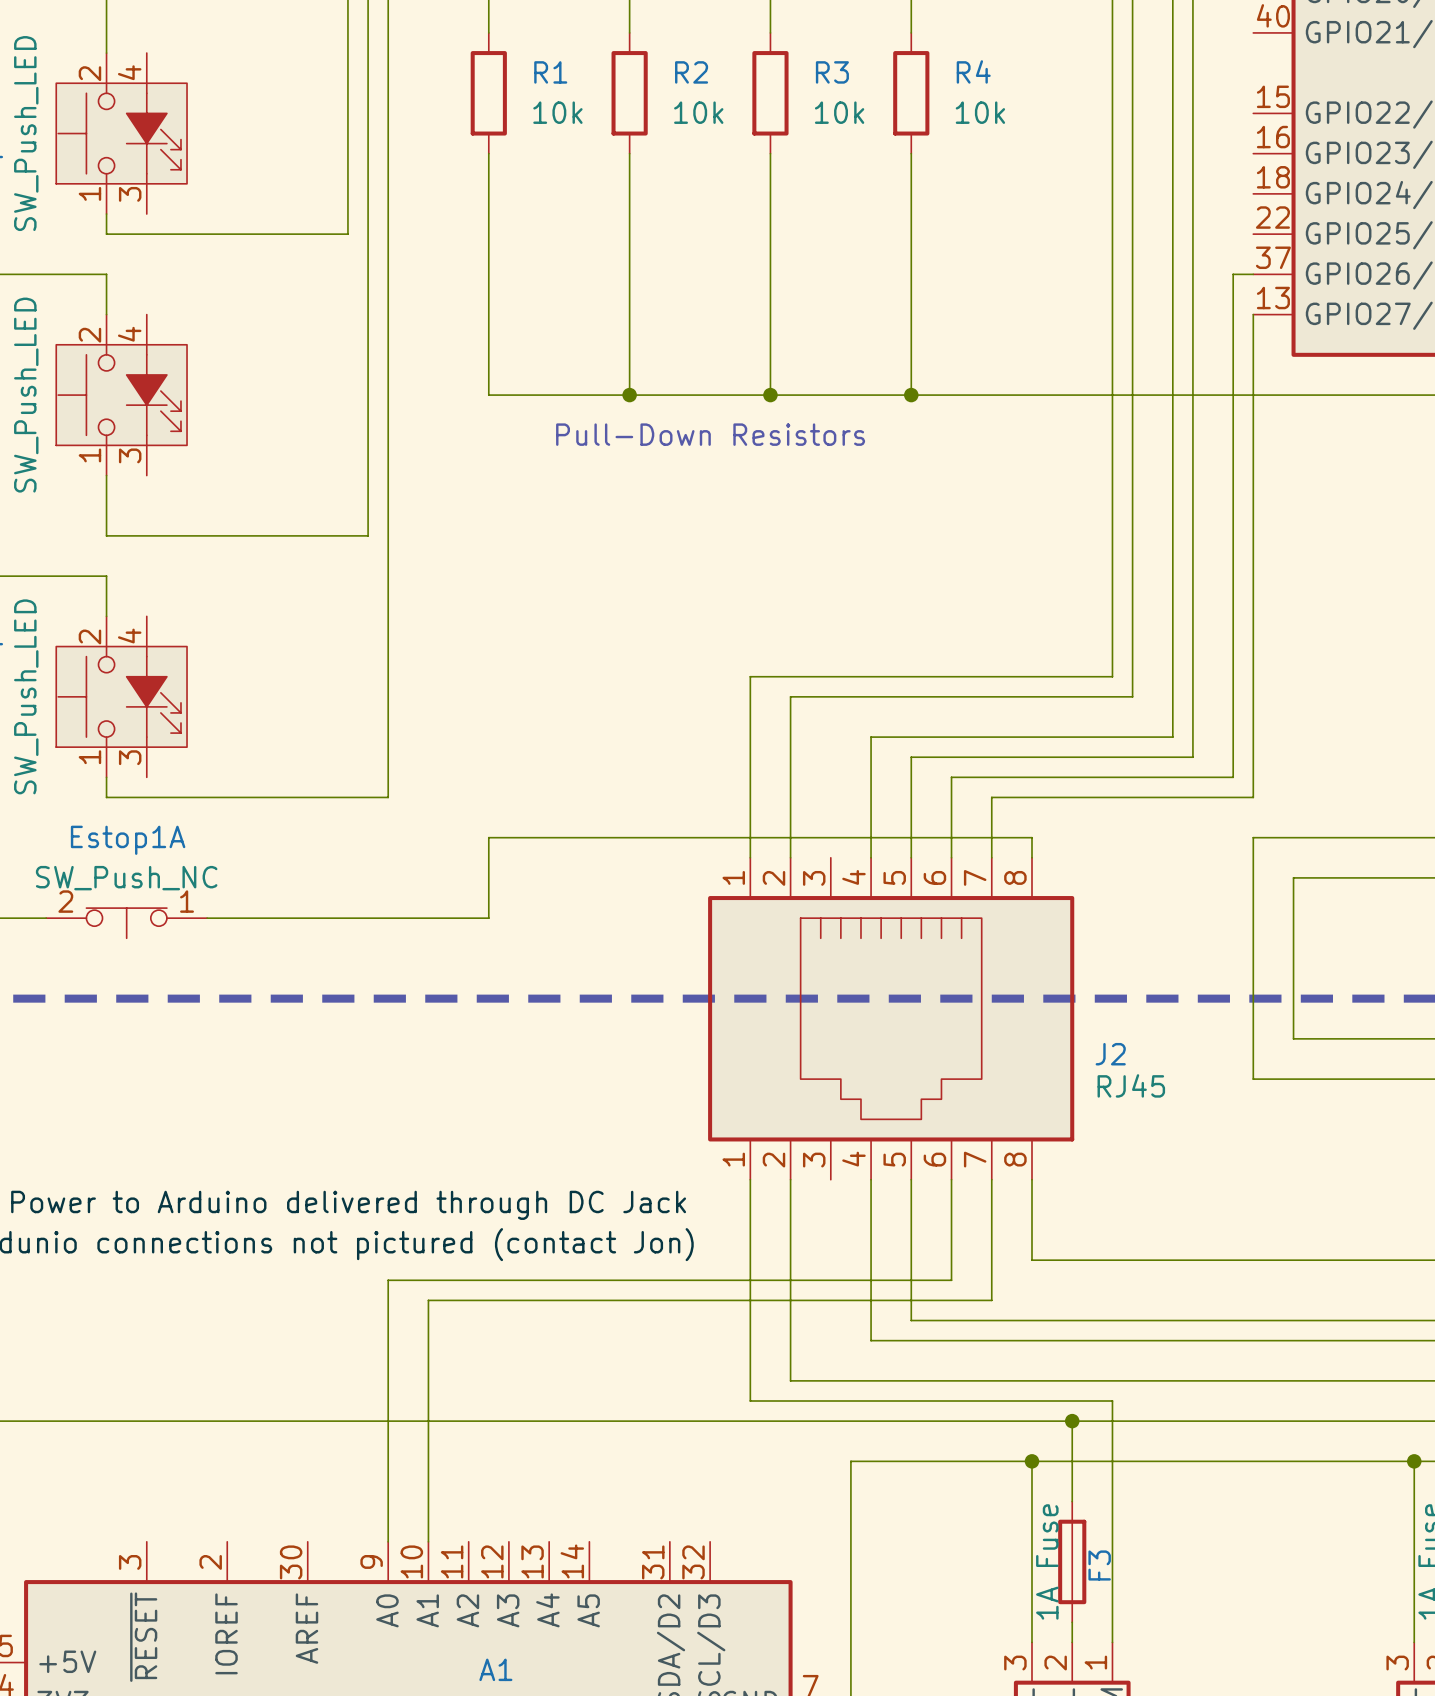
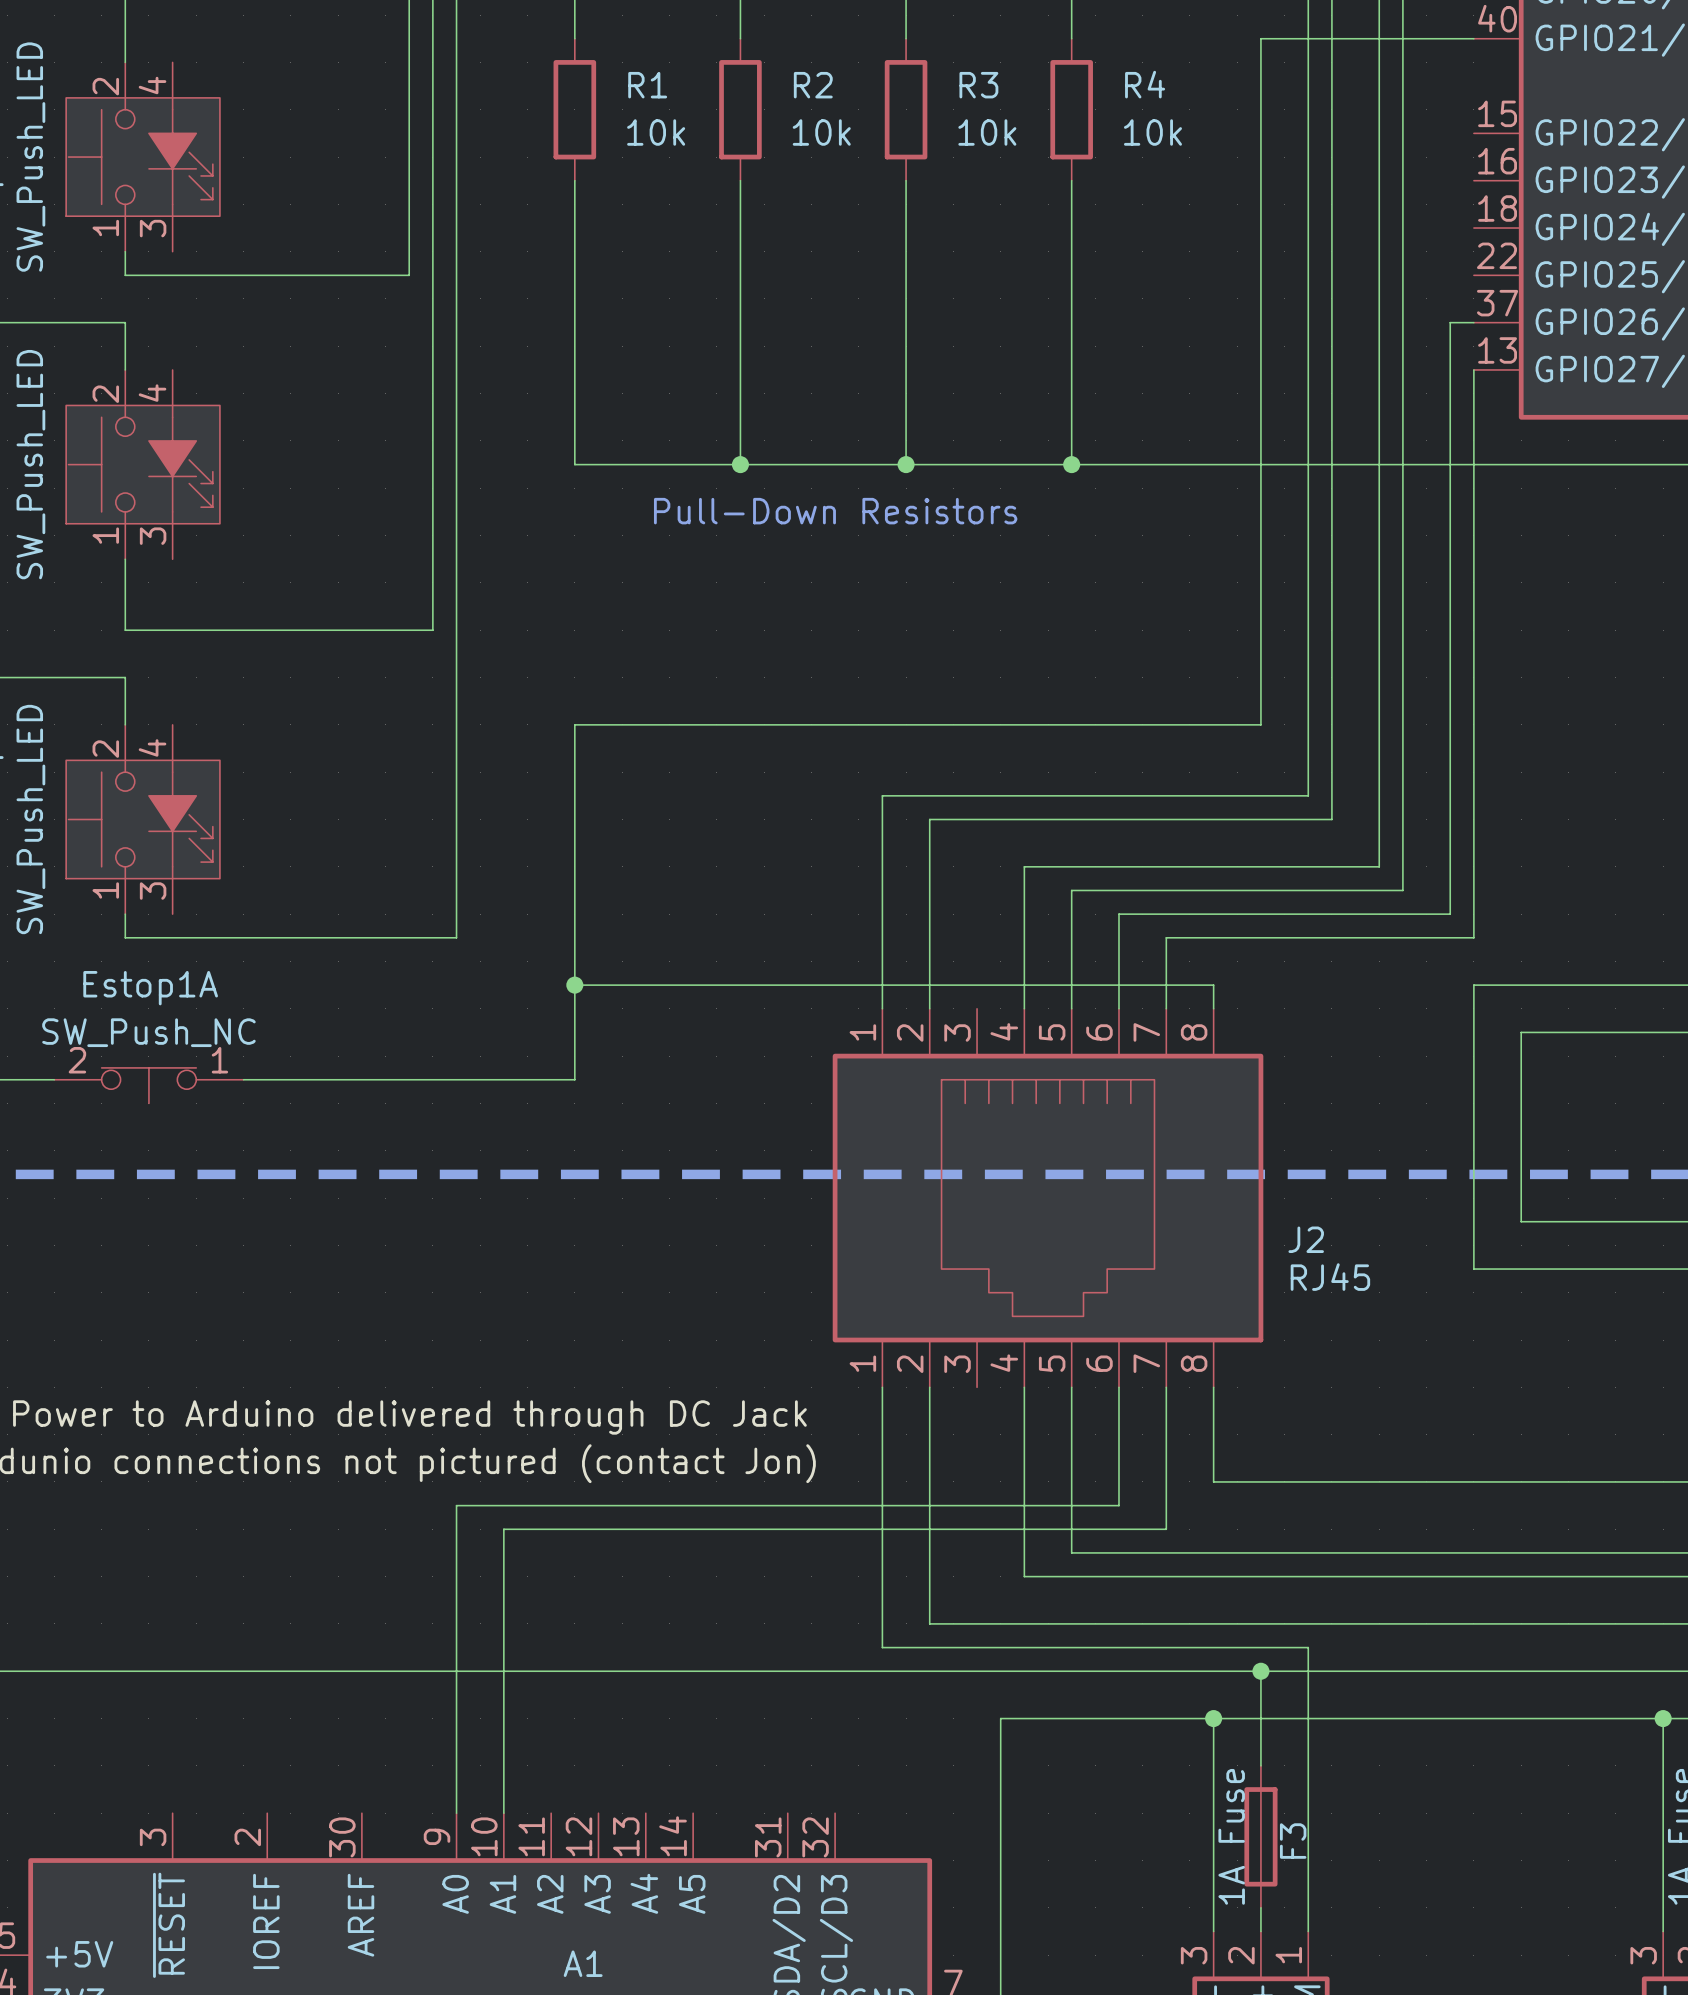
wire: none -> (1473, 38) (1260, 38) (1260, 724) (574, 724) (574, 985)
junction: none -> (574, 985)

